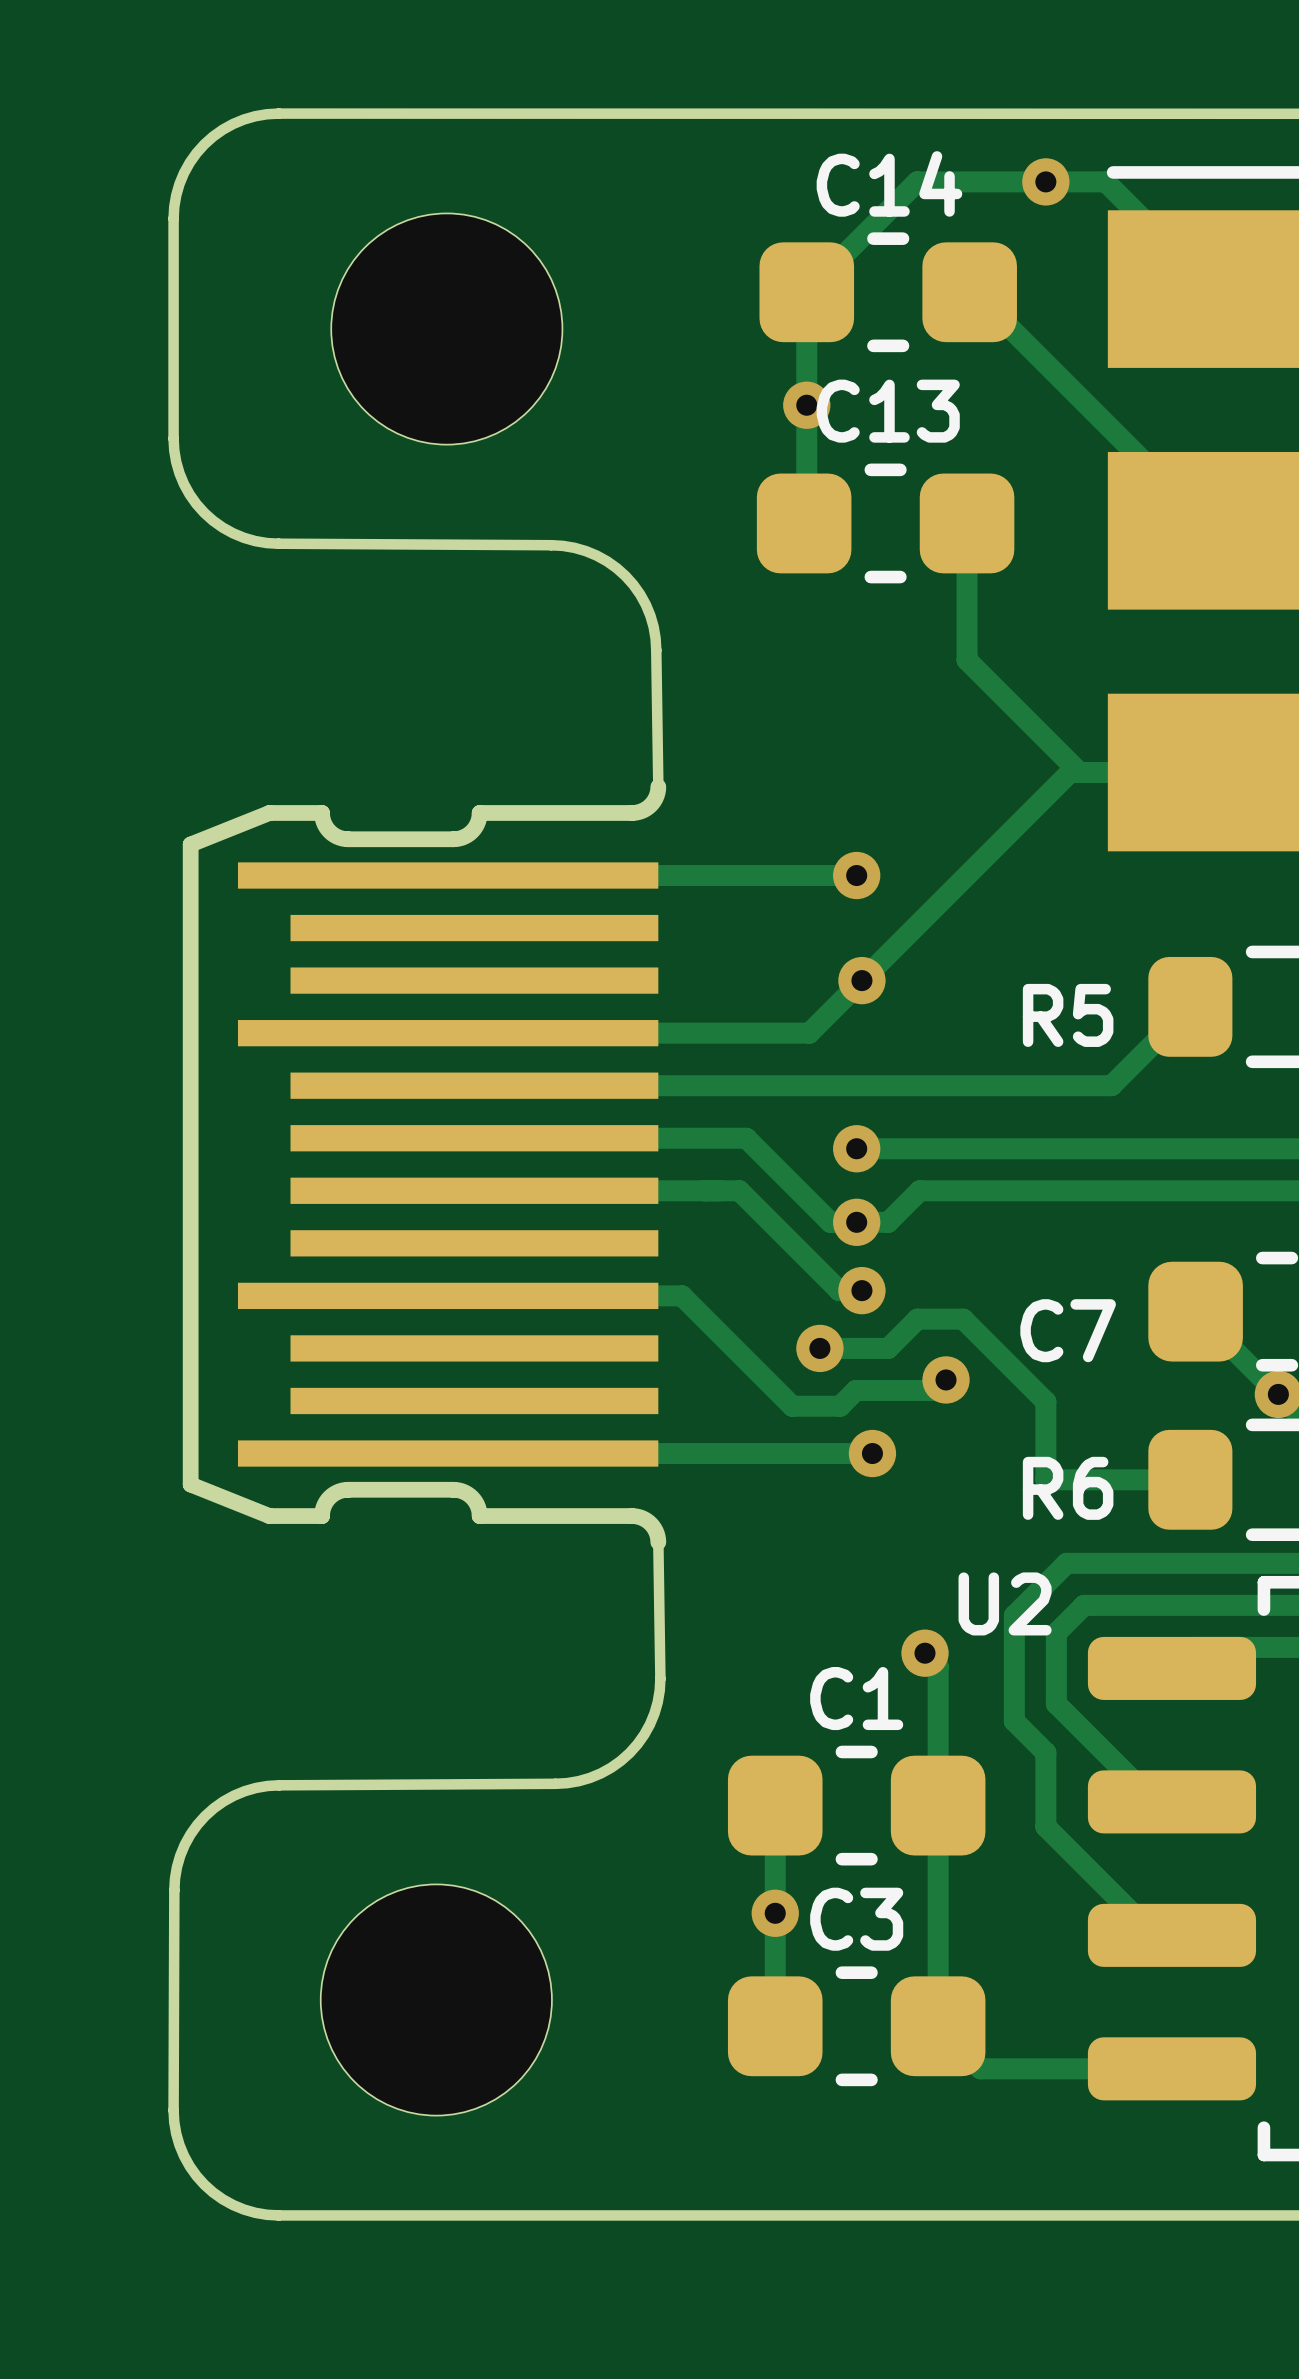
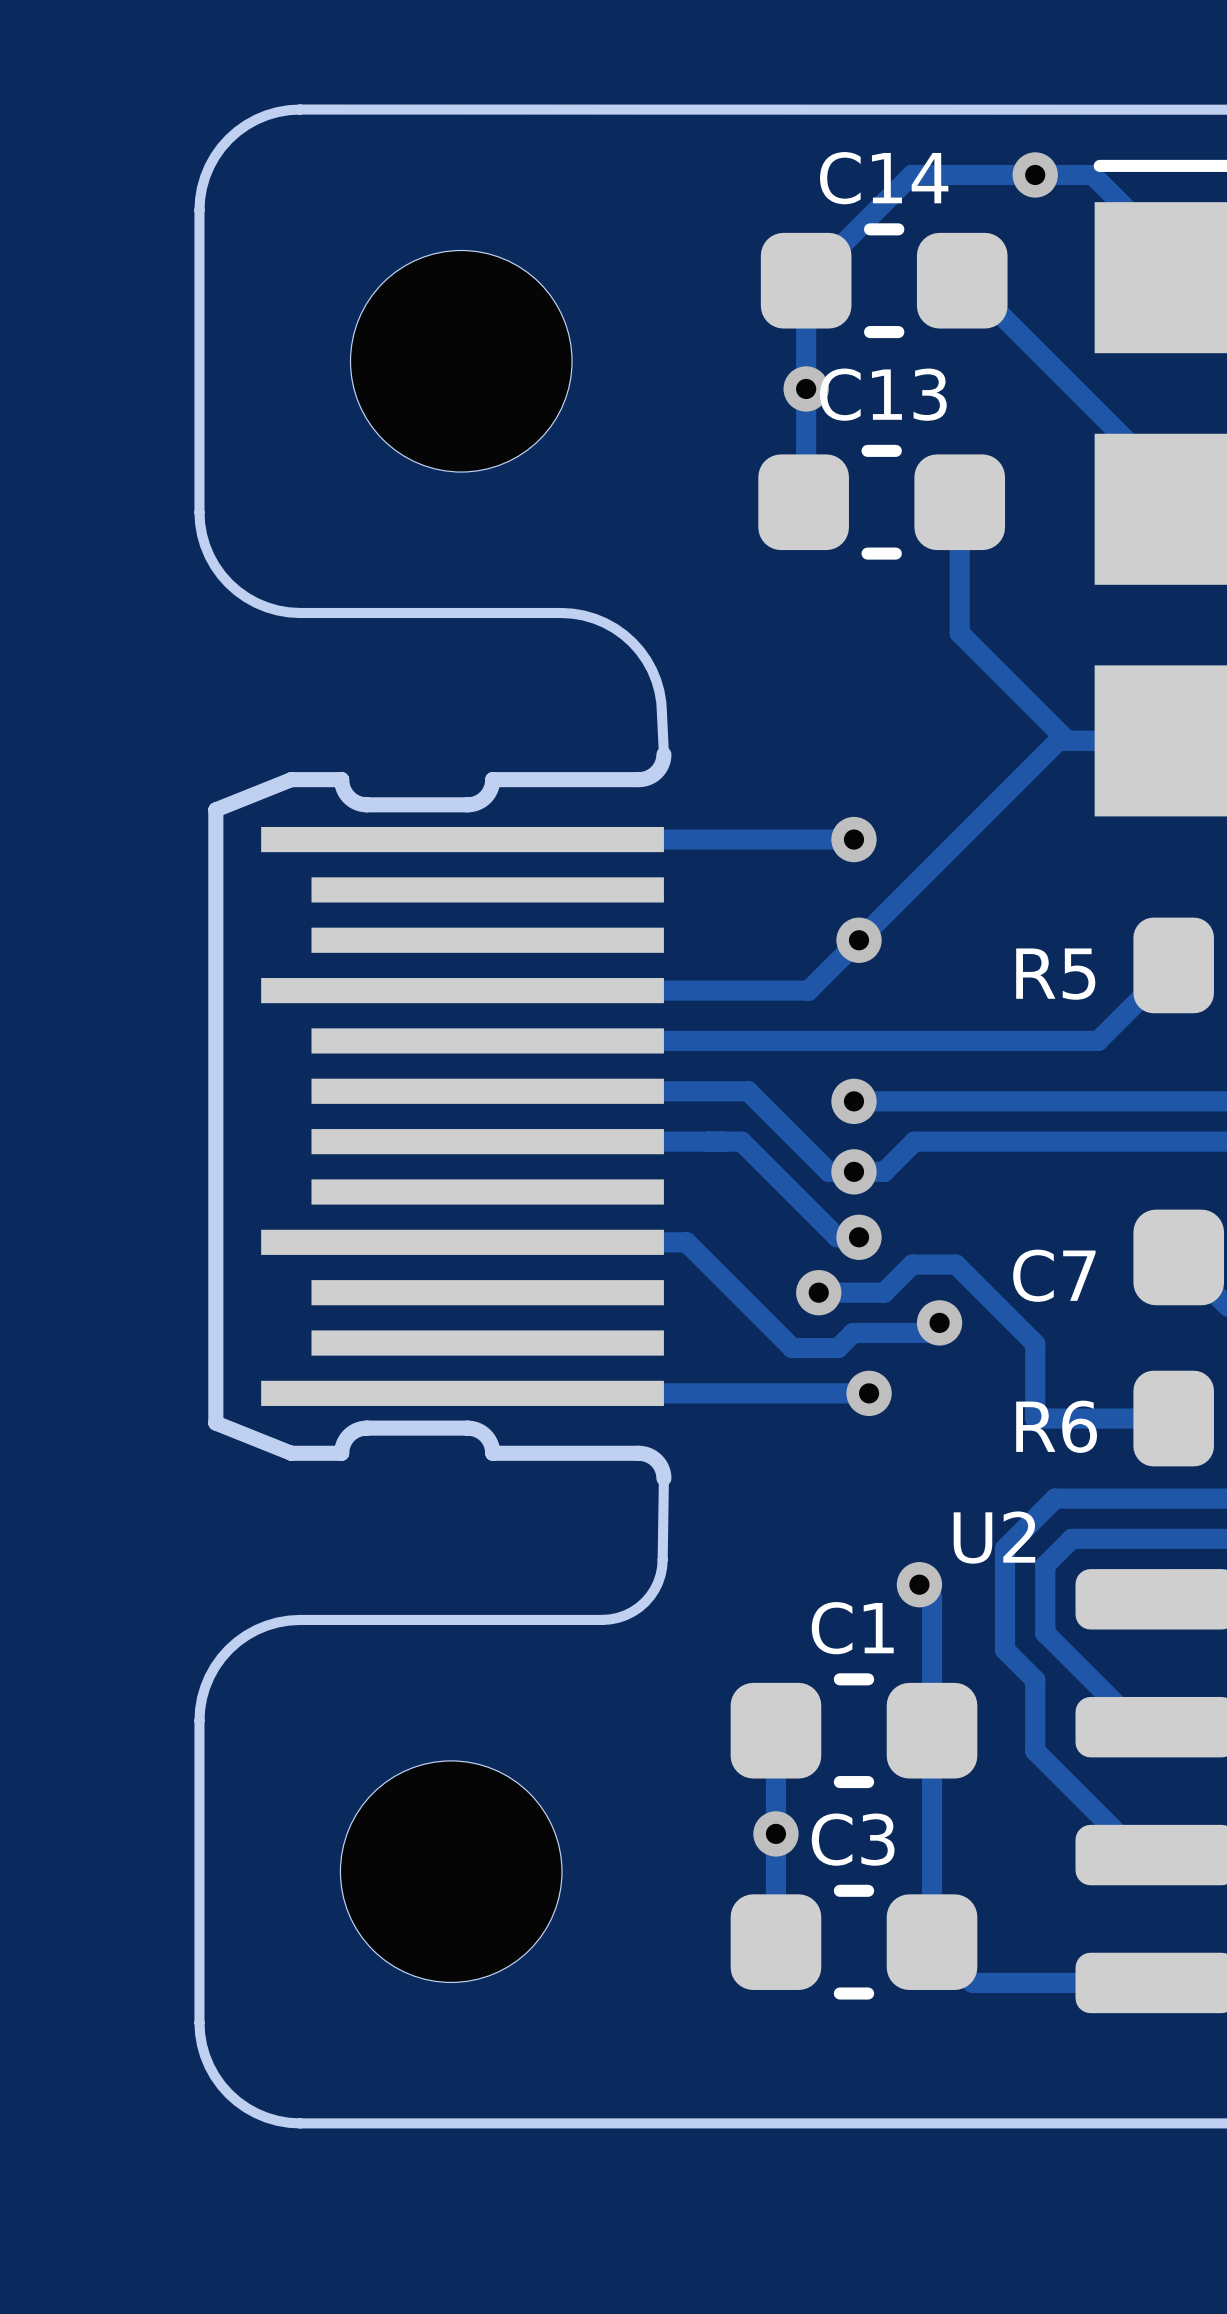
part position: (446, 329) -> (461, 361)
board edge: (173, 438) (176, 462) (189, 494) (213, 520) (243, 537) (278, 543) (562, 545) (585, 551) (616, 568) (640, 594) (653, 626) (656, 650) (658, 786) -> (199, 420) (199, 512) (202, 534) (214, 565) (237, 591) (266, 607) (288, 612) (561, 613) (594, 618) (614, 628) (632, 642) (651, 670) (661, 702) (663, 754)
board edge: (658, 1542) (660, 1678) (657, 1702) (644, 1734) (629, 1753) (611, 1767) (578, 1781) (555, 1783) (267, 1785) (244, 1791) (223, 1801) (197, 1824) (184, 1844) (175, 1878) (173, 2110) -> (663, 1478) (662, 1559) (660, 1575) (650, 1596) (639, 1607) (625, 1615) (602, 1619) (288, 1620) (256, 1629) (237, 1641) (221, 1657) (209, 1676) (200, 1709) (199, 2022)
part position: (436, 2000) -> (451, 1871)

